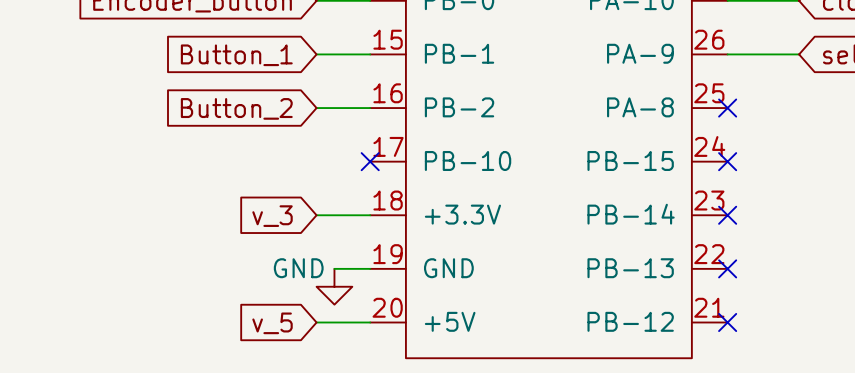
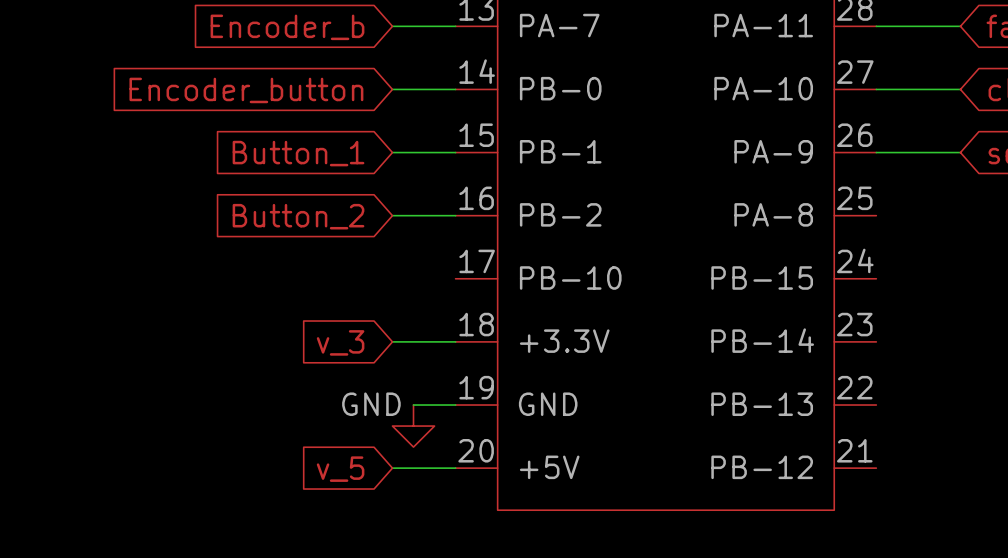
no-connect mark: (727, 108) -> none
no-connect mark: (370, 161) -> none
no-connect mark: (727, 161) -> none
no-connect mark: (727, 215) -> none
no-connect mark: (727, 268) -> none
no-connect mark: (727, 322) -> none

